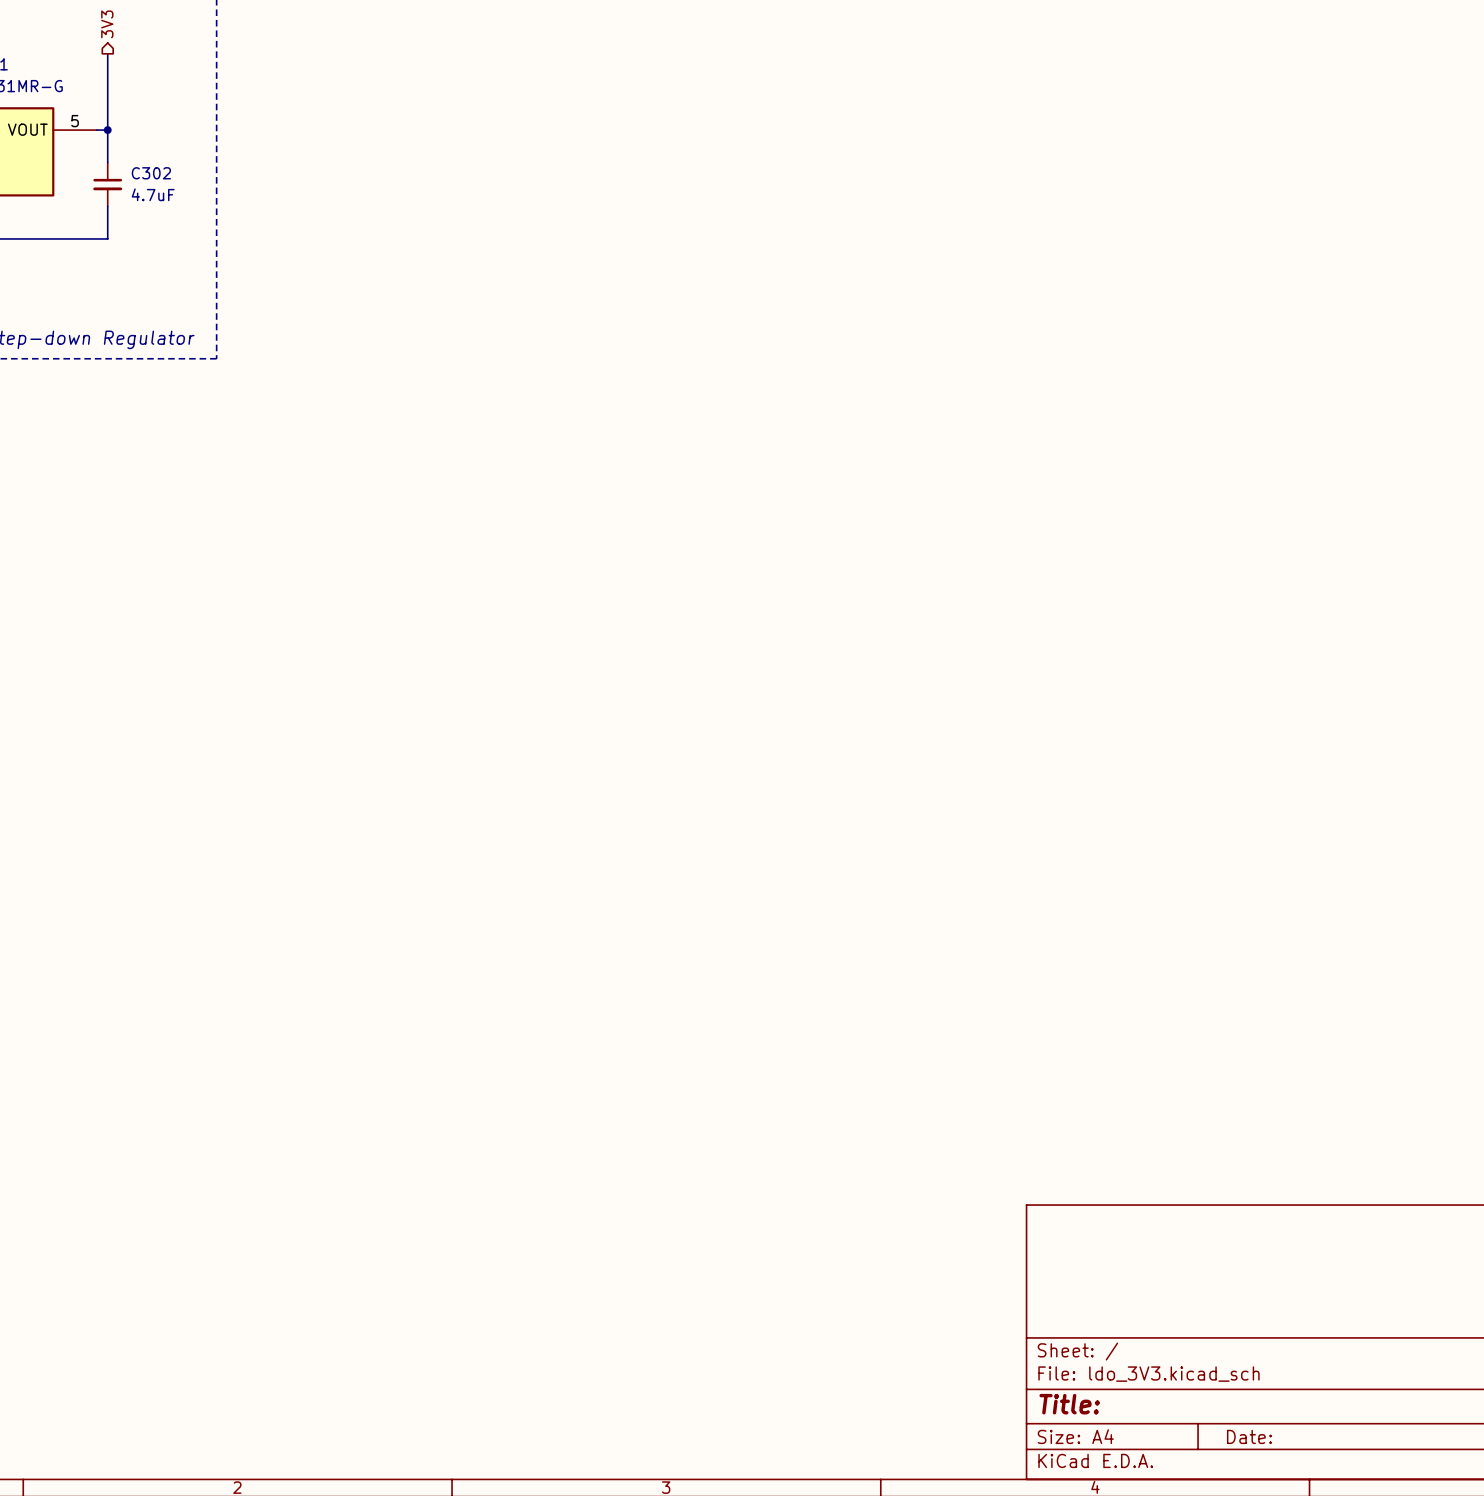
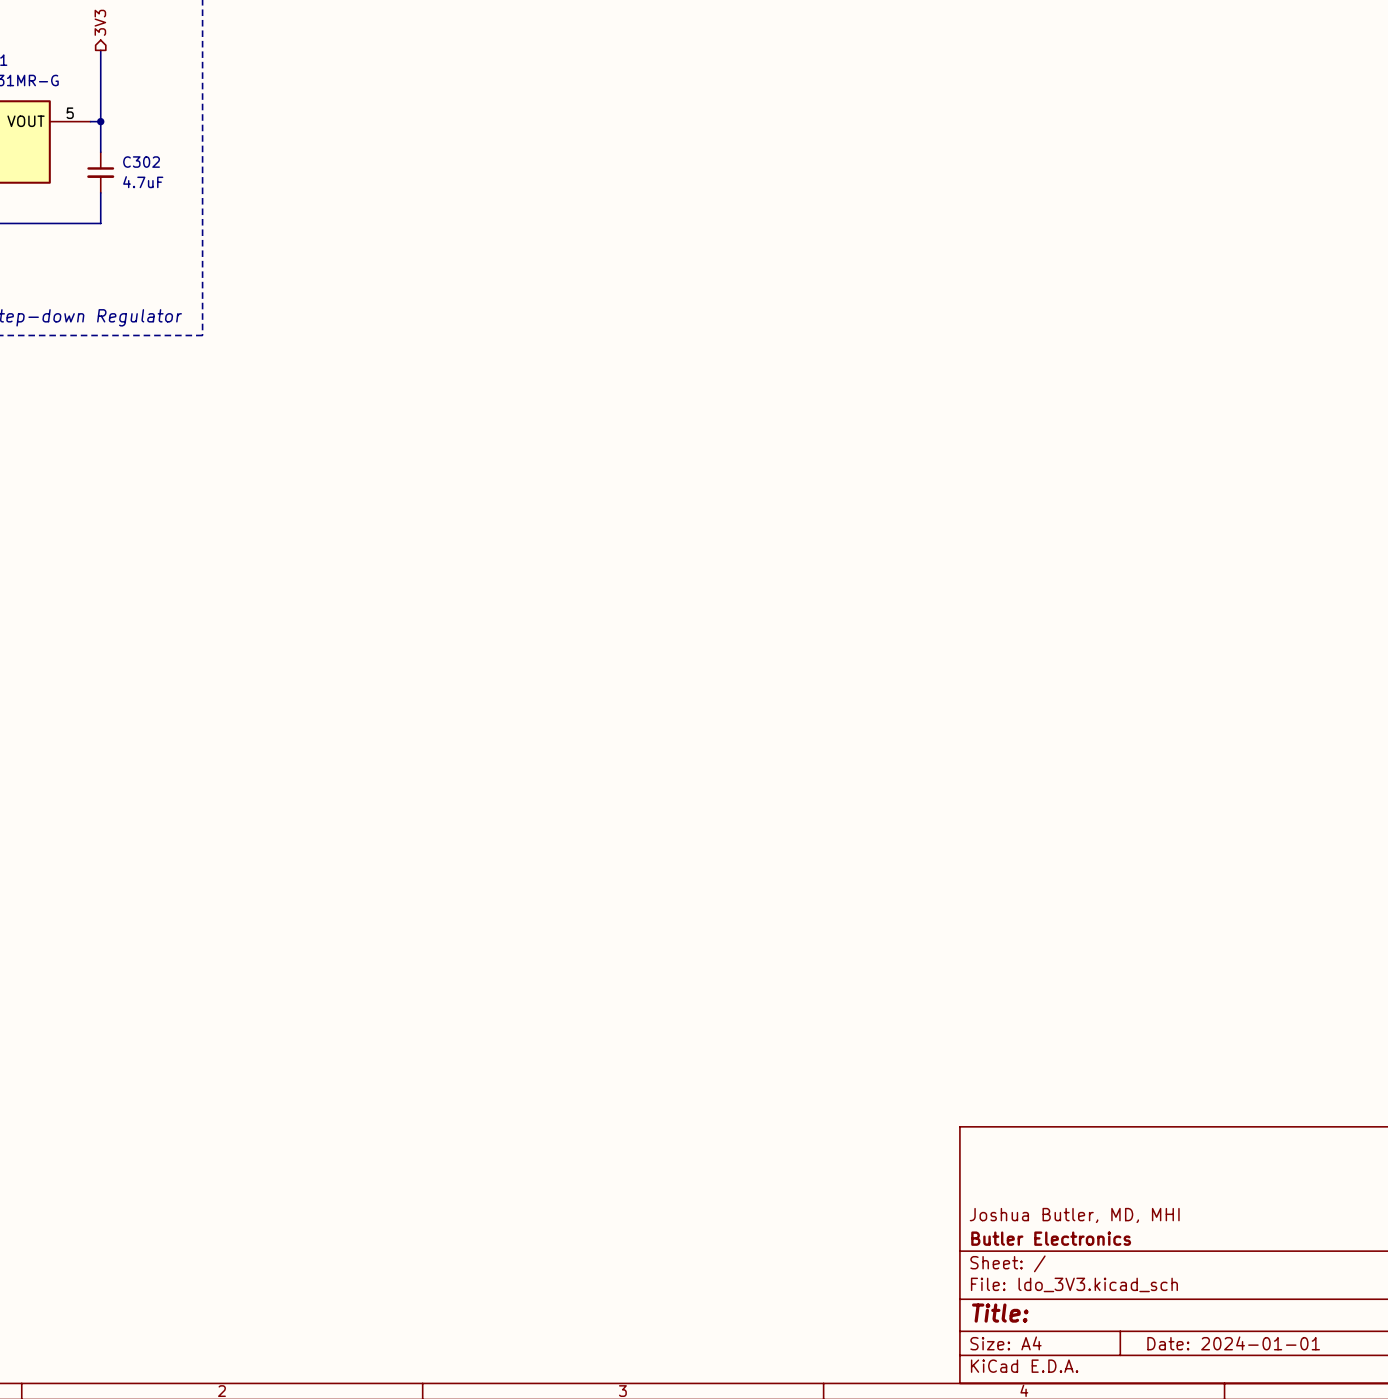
title block: none -> Joshua Butler, MD, MHI (1074, 1215)
title block: none -> Butler Electronics (1051, 1238)
title block: Date: (1249, 1436) -> Date: 2024-01-01 (1233, 1343)

